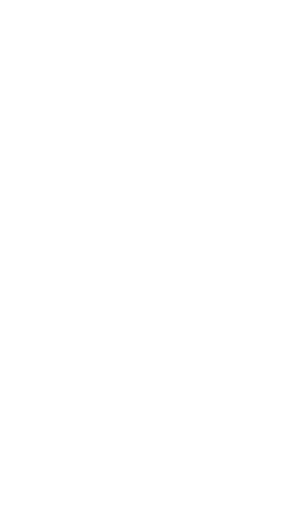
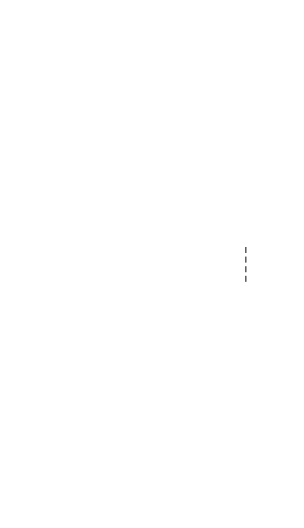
line: none -> (245, 245) (245, 281)

